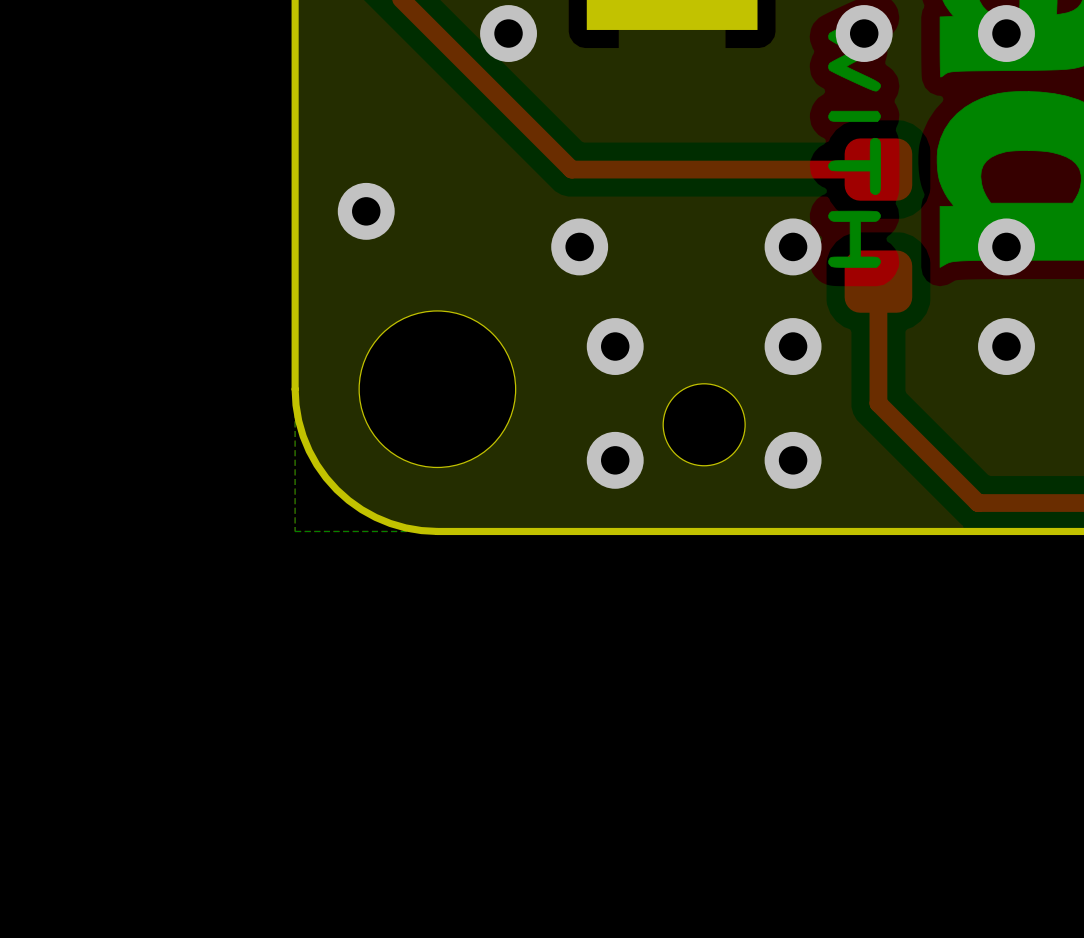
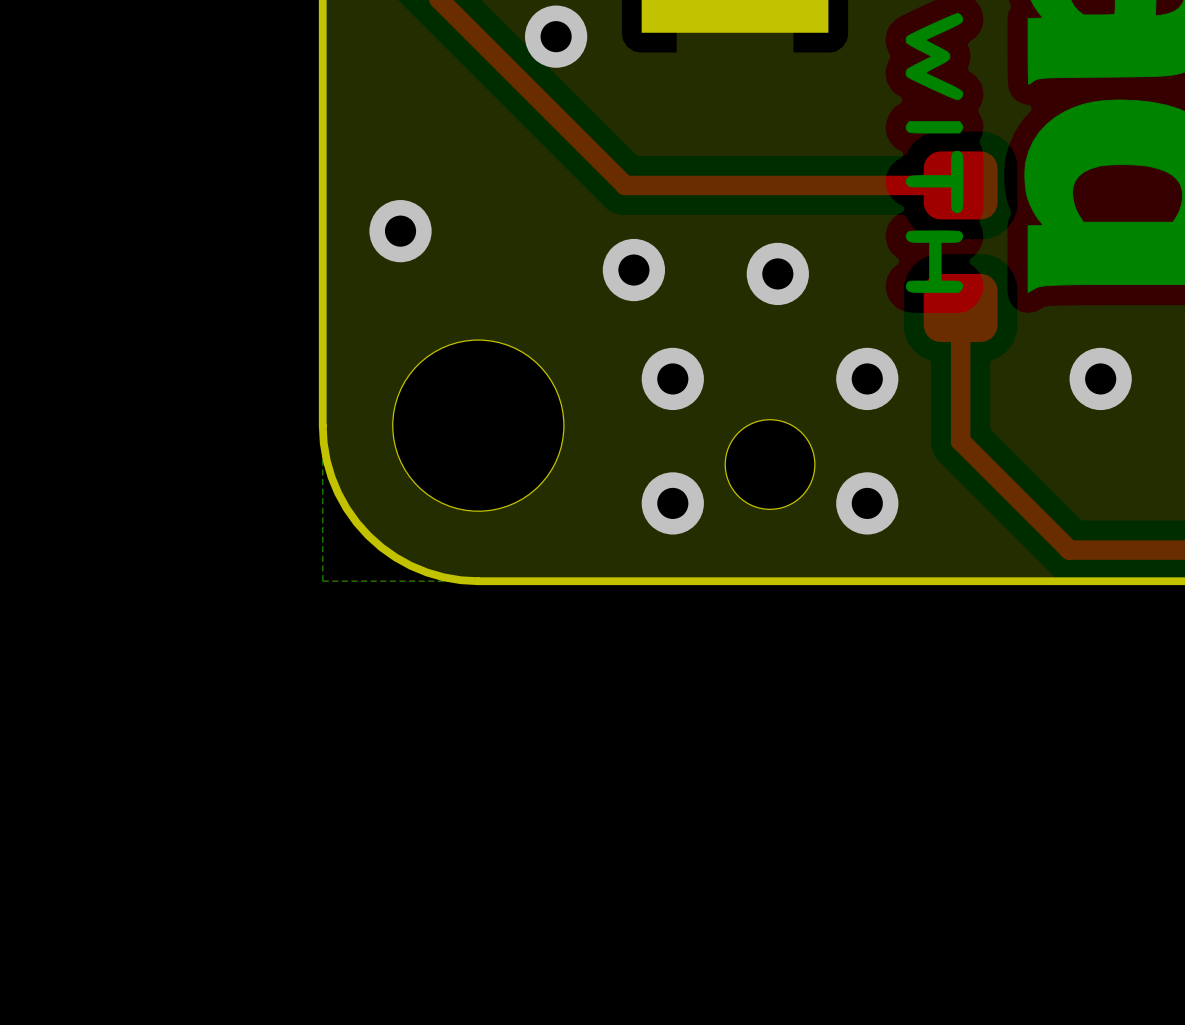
via: (864, 33) -> none
via: (1006, 33) -> none
via position: (793, 246) -> (777, 273)
via: (1006, 246) -> none

